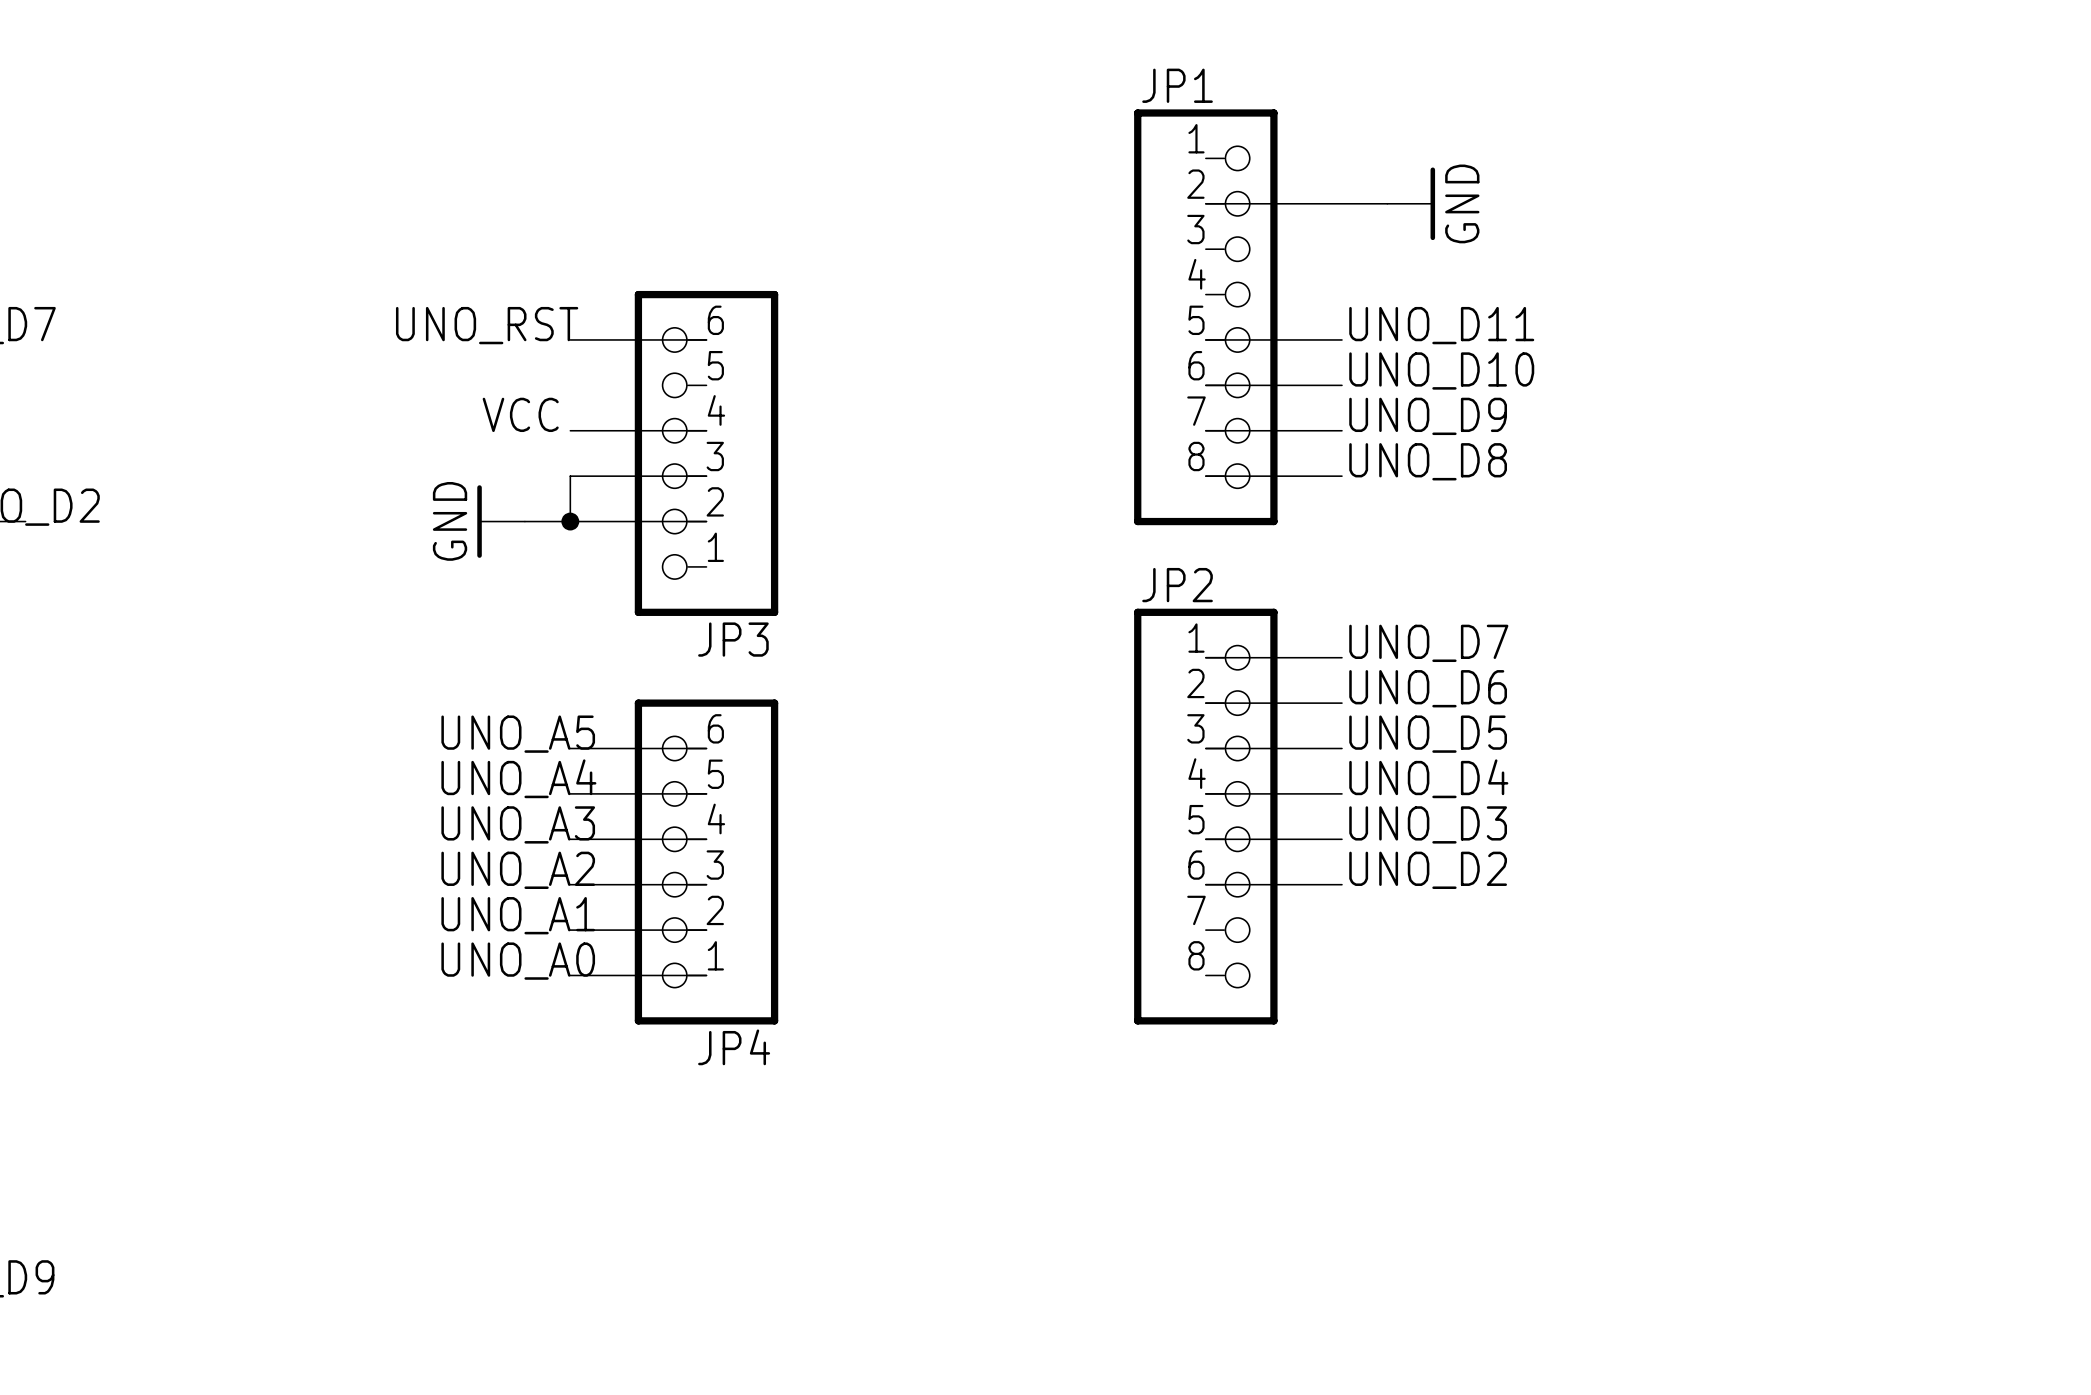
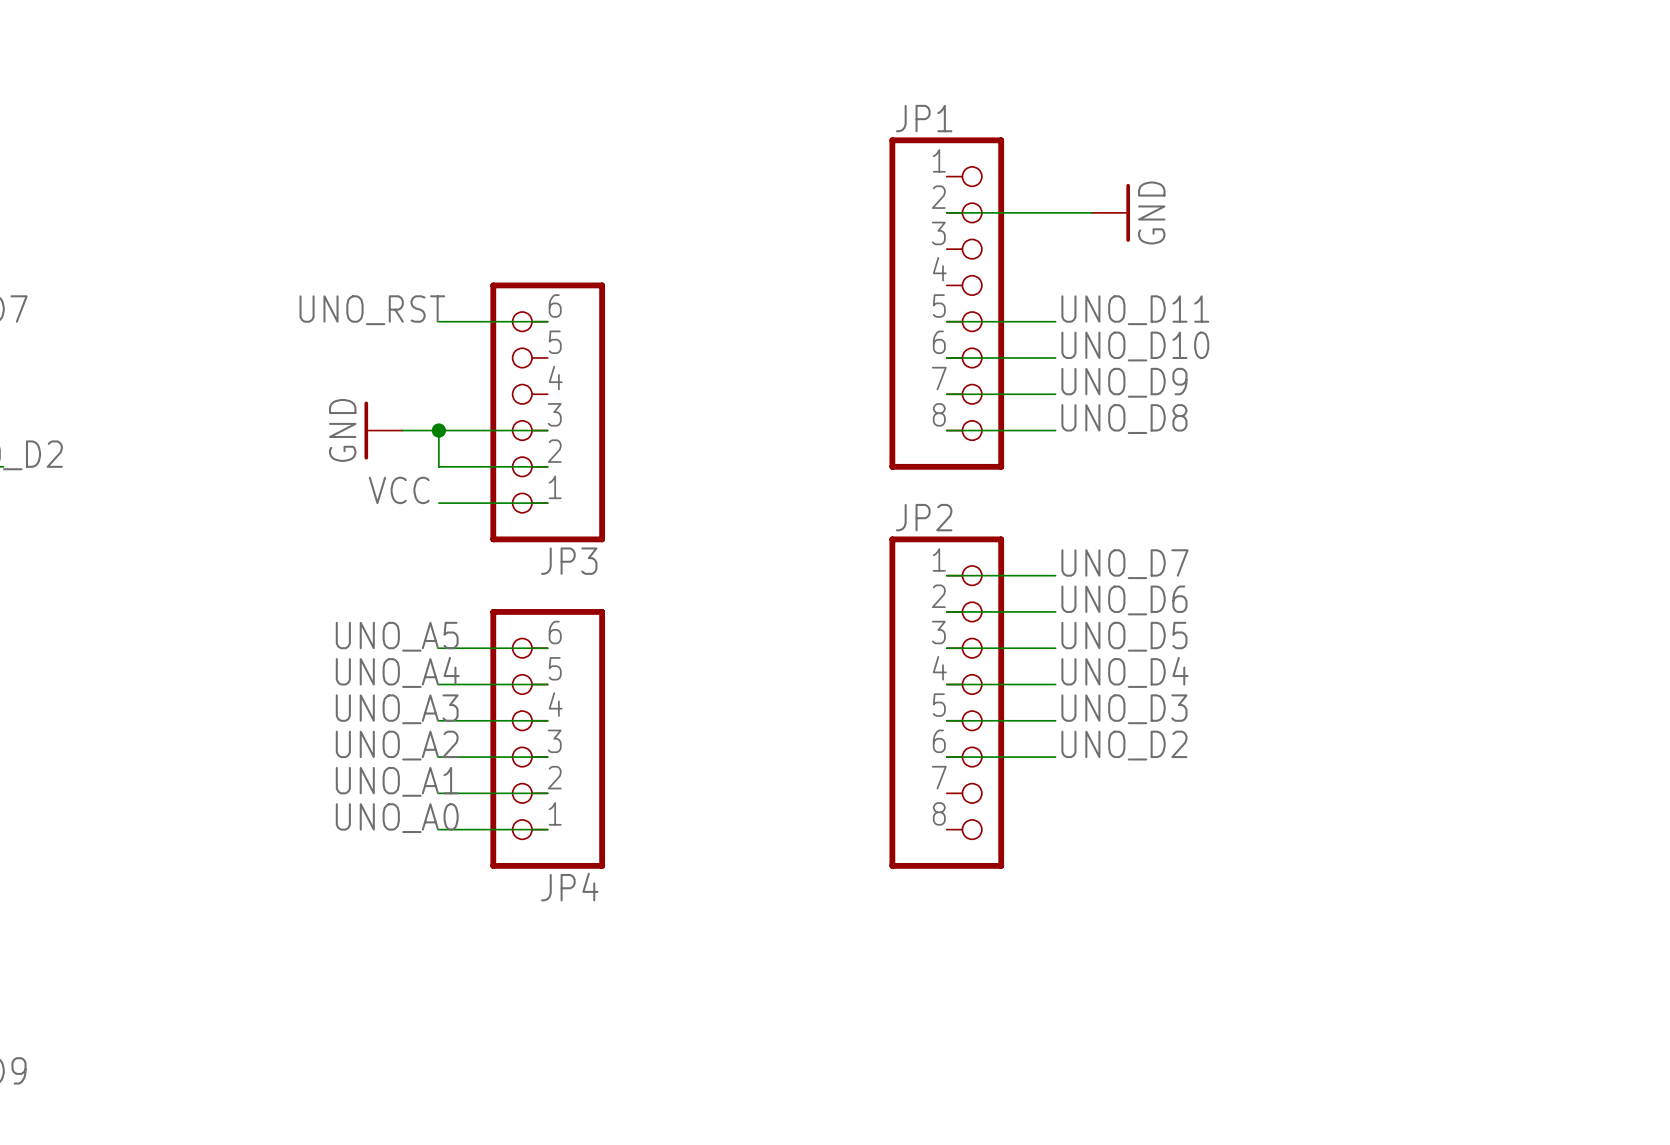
label position: VCC (520, 414) -> VCC (399, 490)
wire: (570, 430) (706, 430) -> (438, 503) (547, 503)
power symbol position: GND (501, 521) -> GND (383, 430)
wire: (524, 521) (570, 521) -> (402, 430) (438, 430)
junction position: (570, 521) -> (438, 430)

